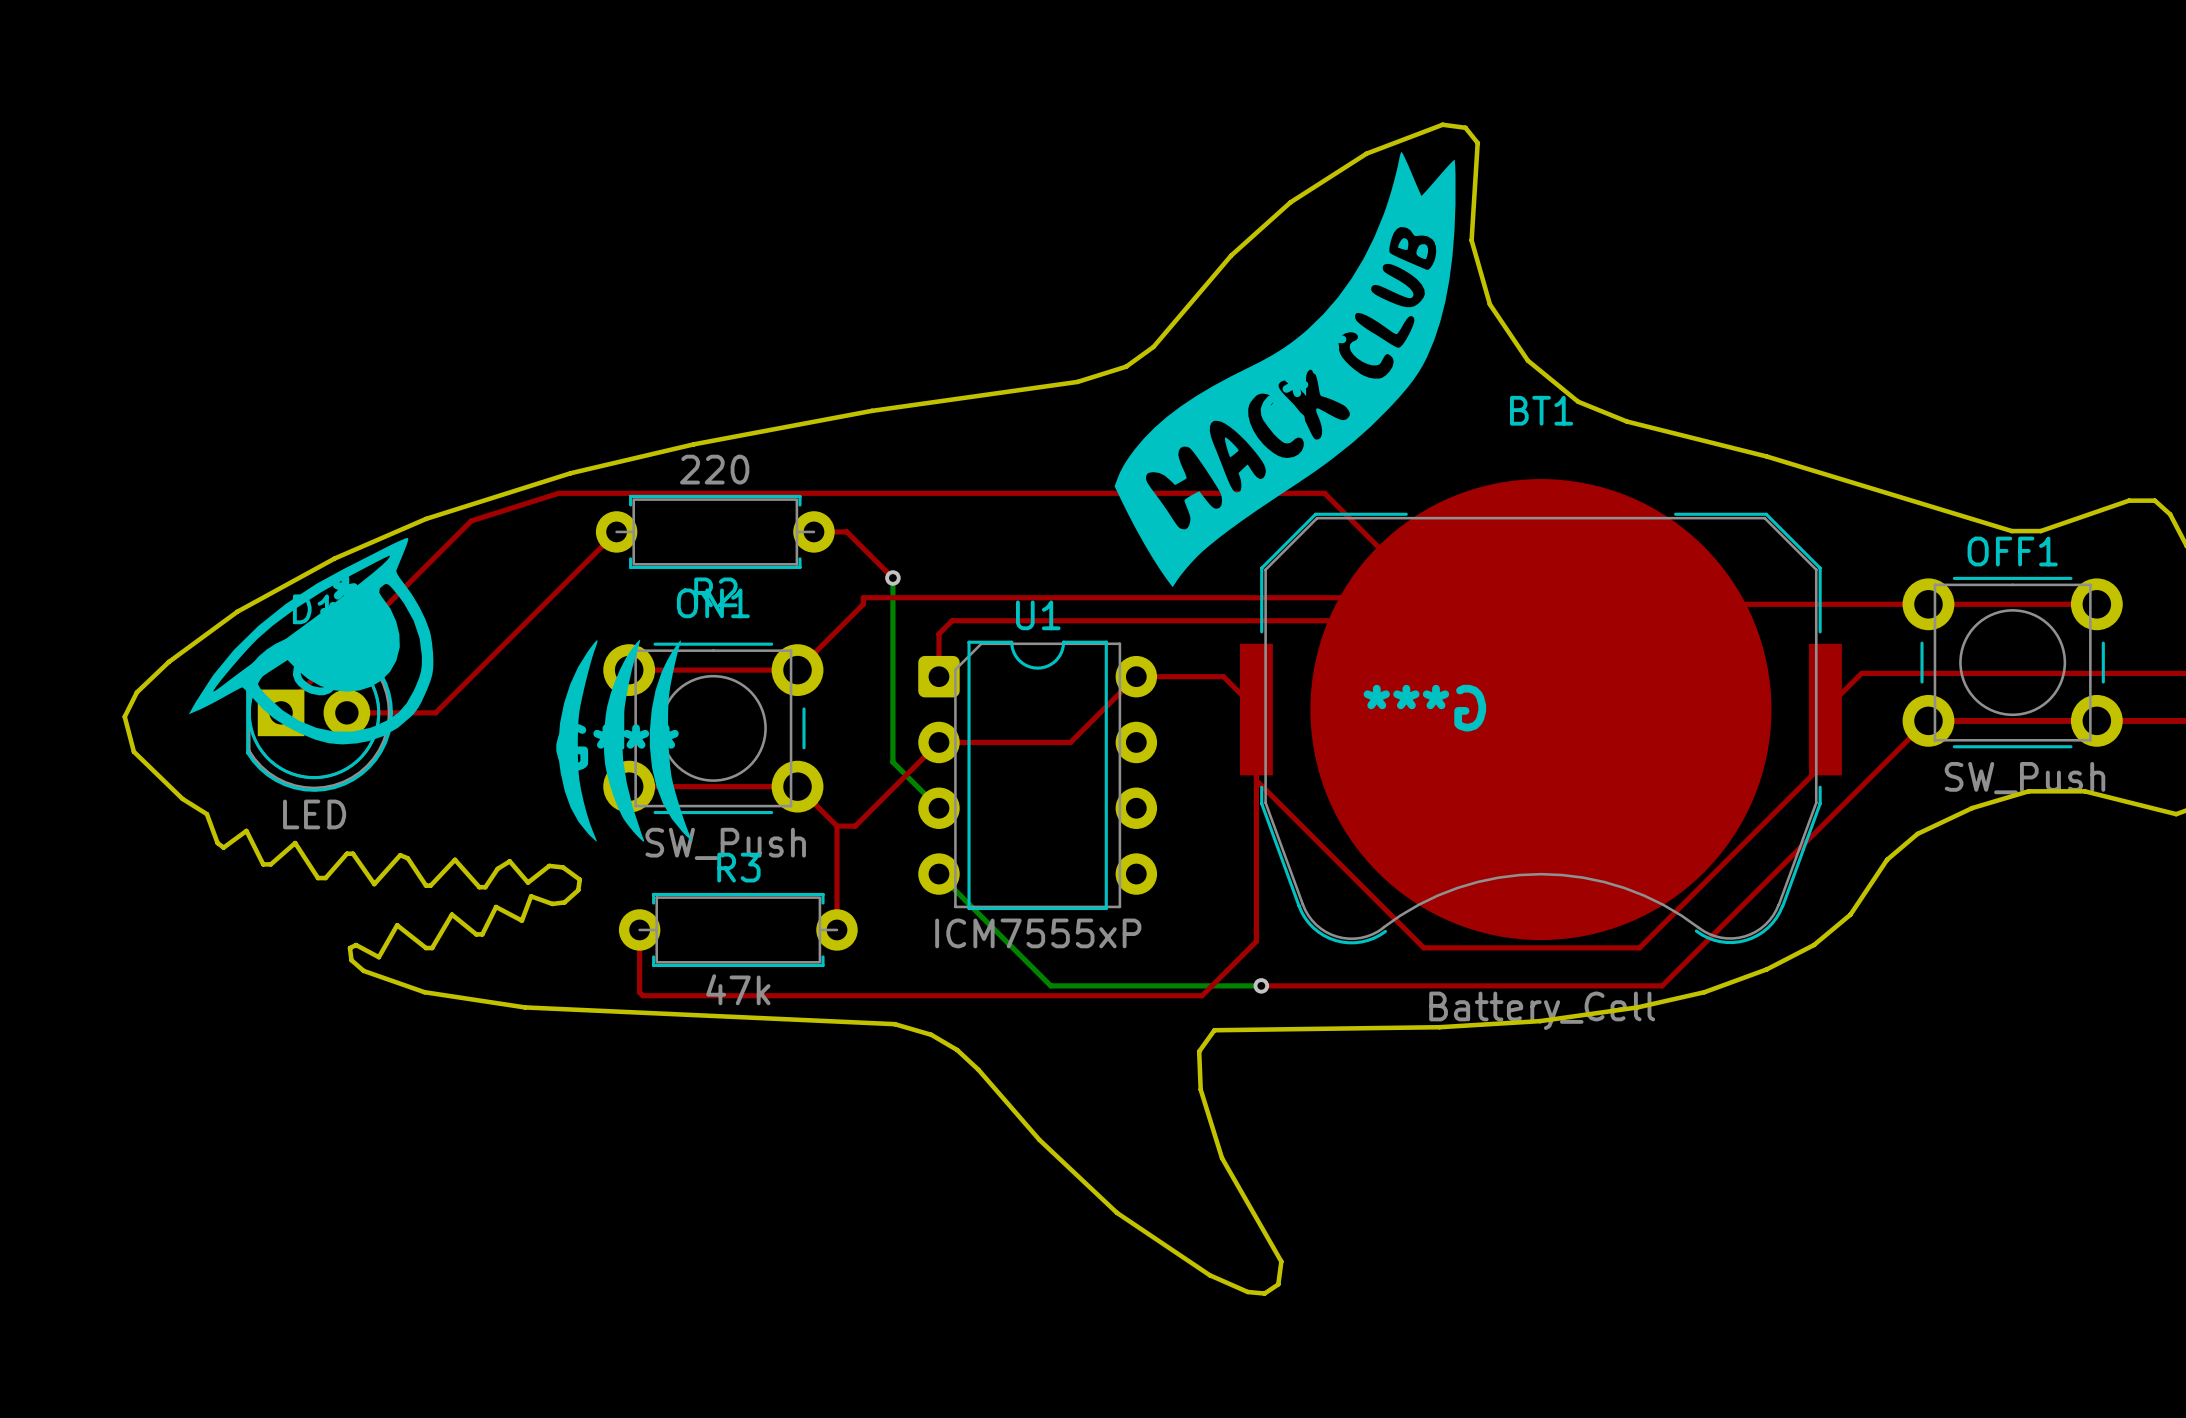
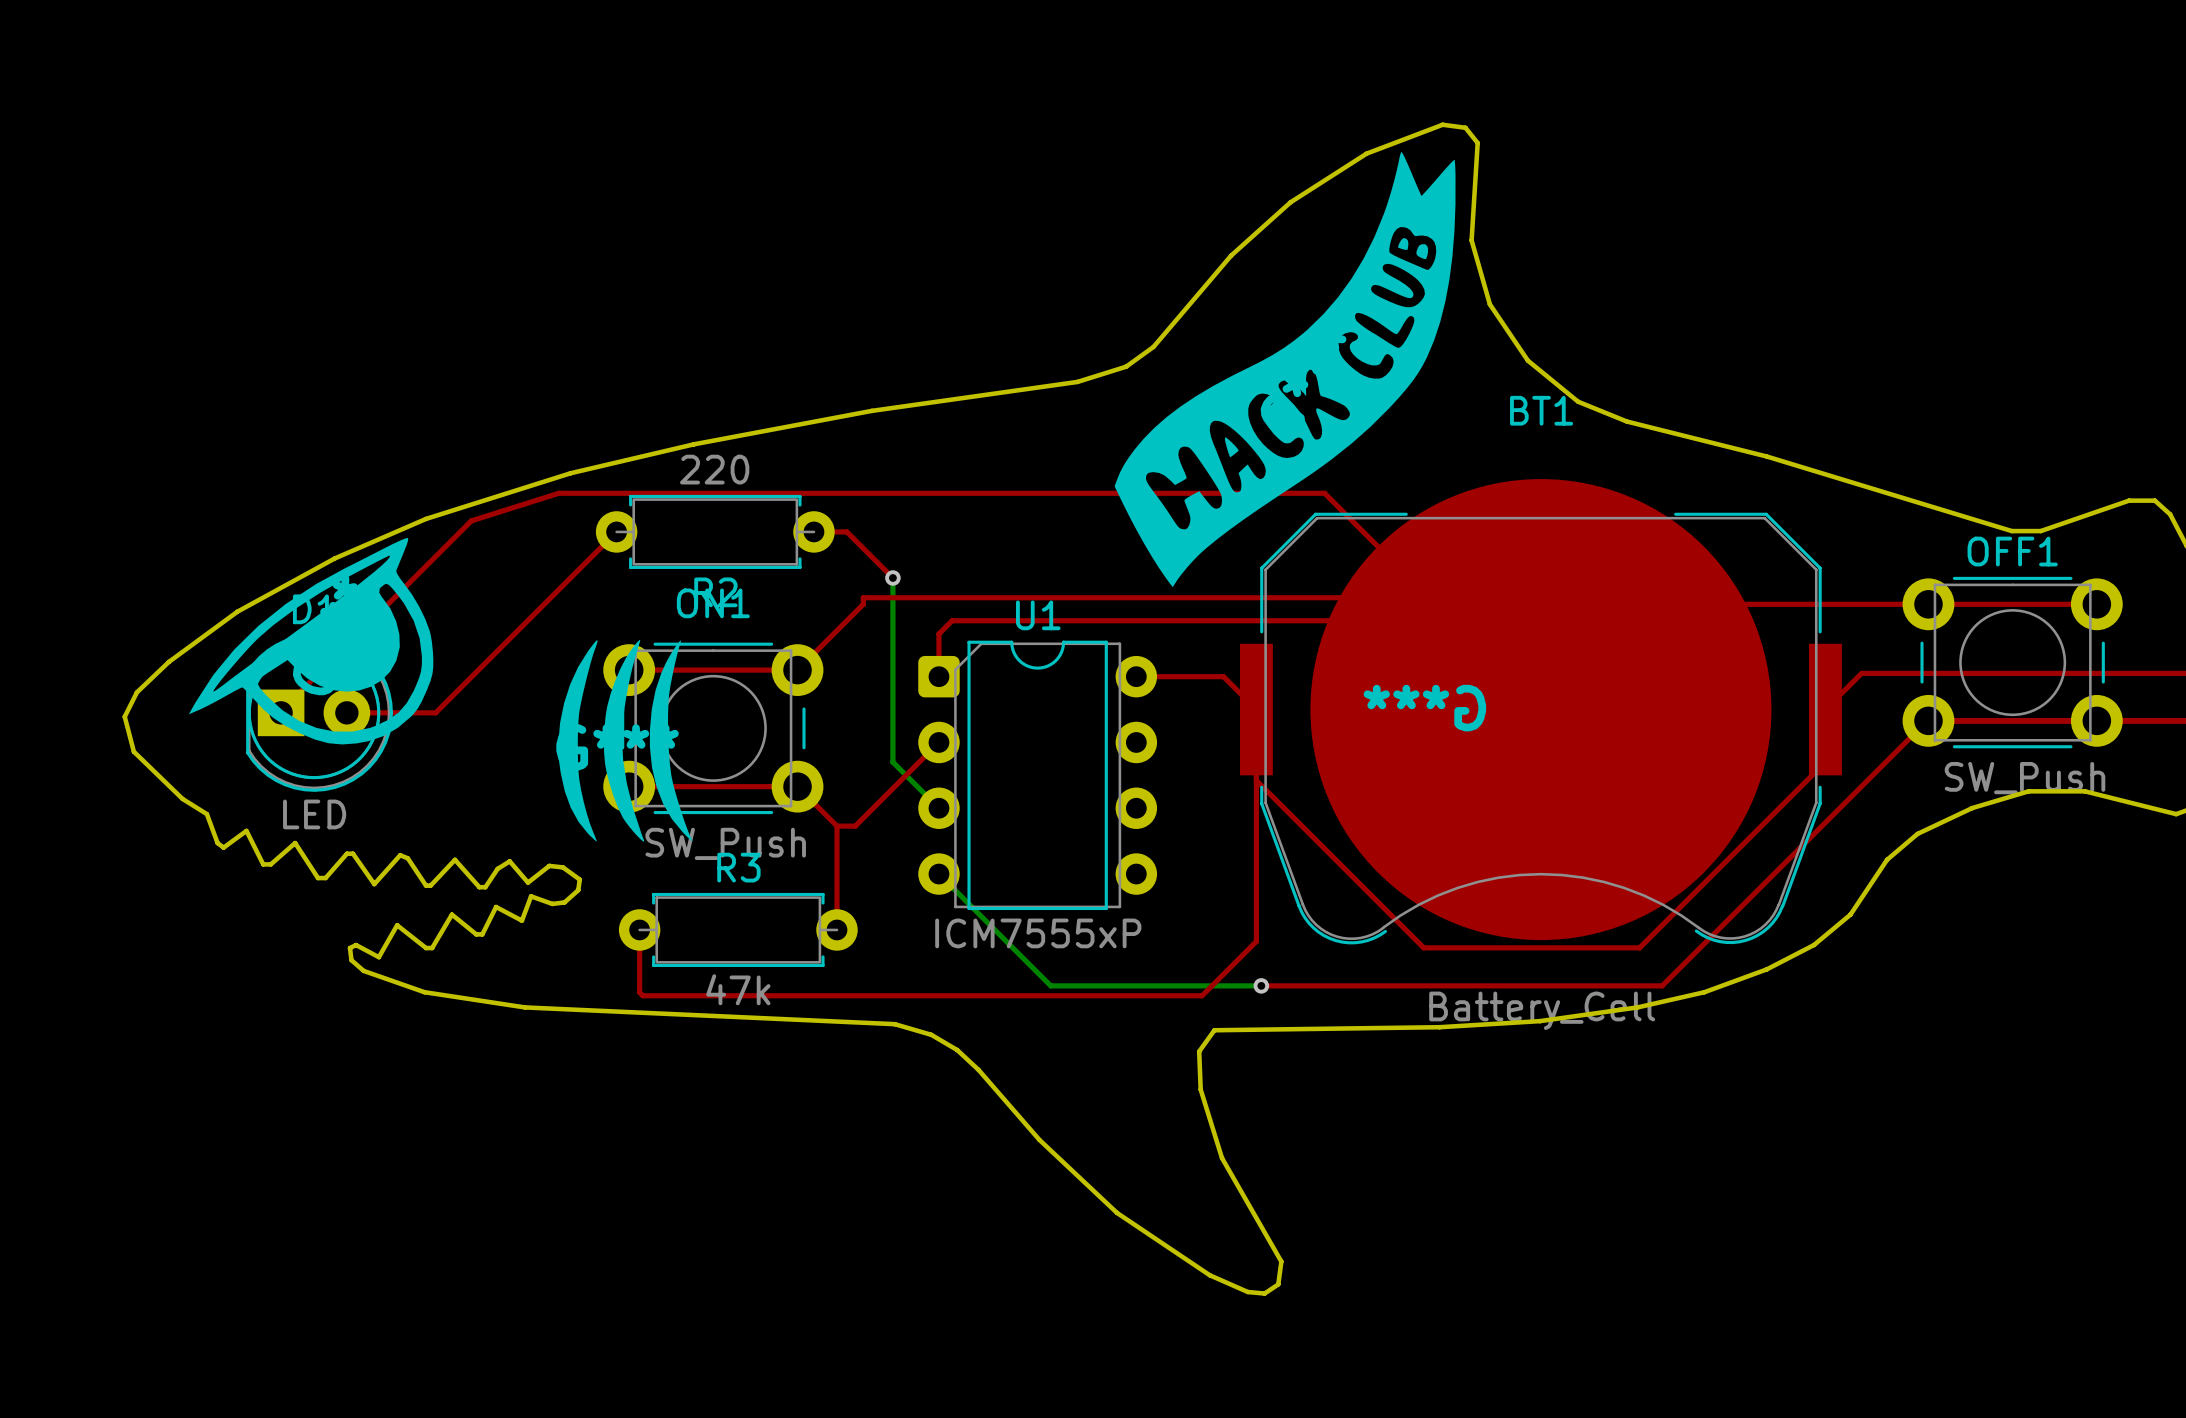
top track: (1136, 676) (1070, 742) (938, 742) -> none

